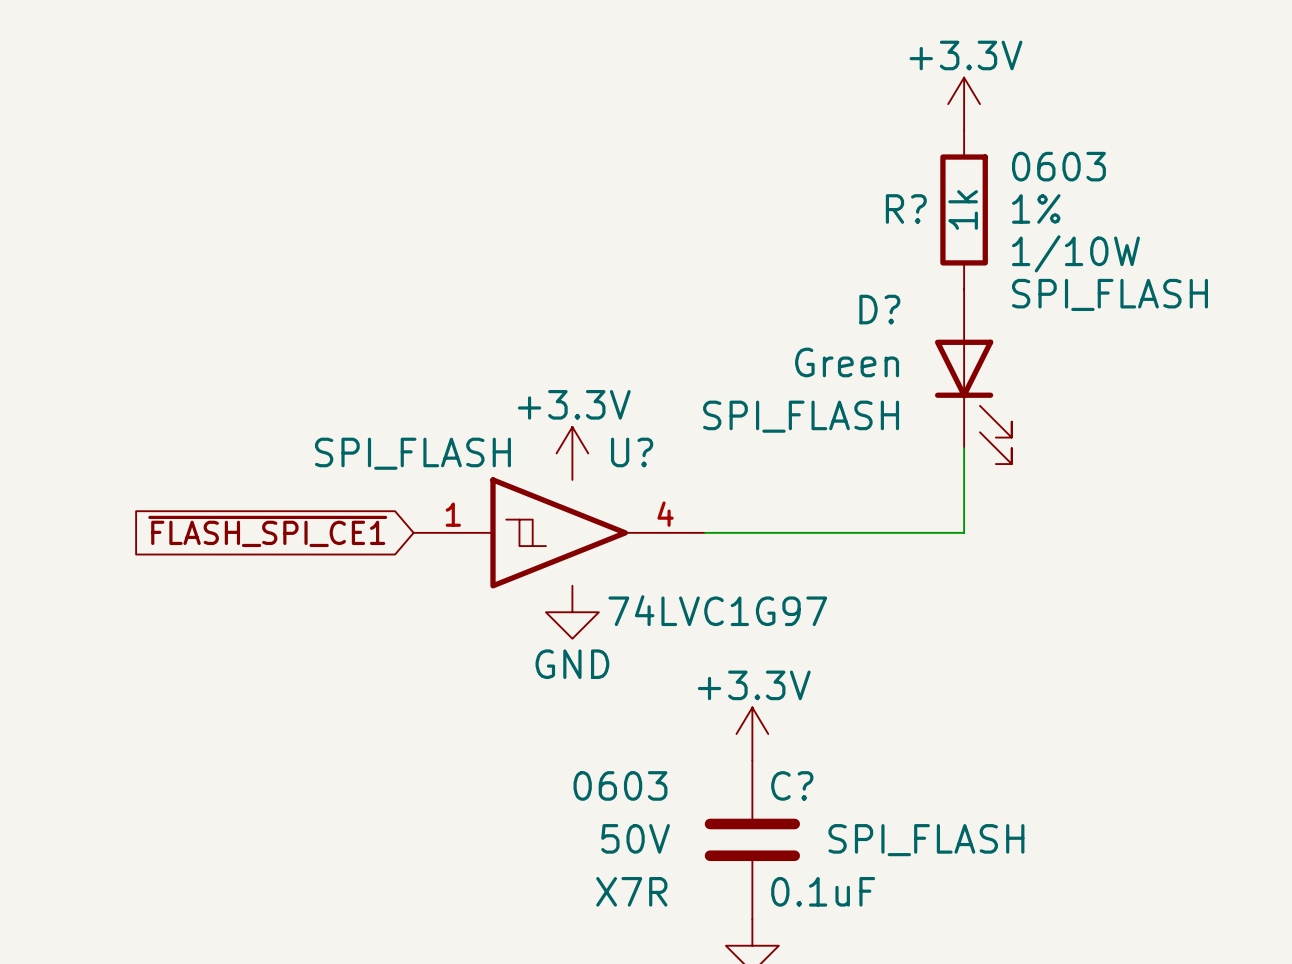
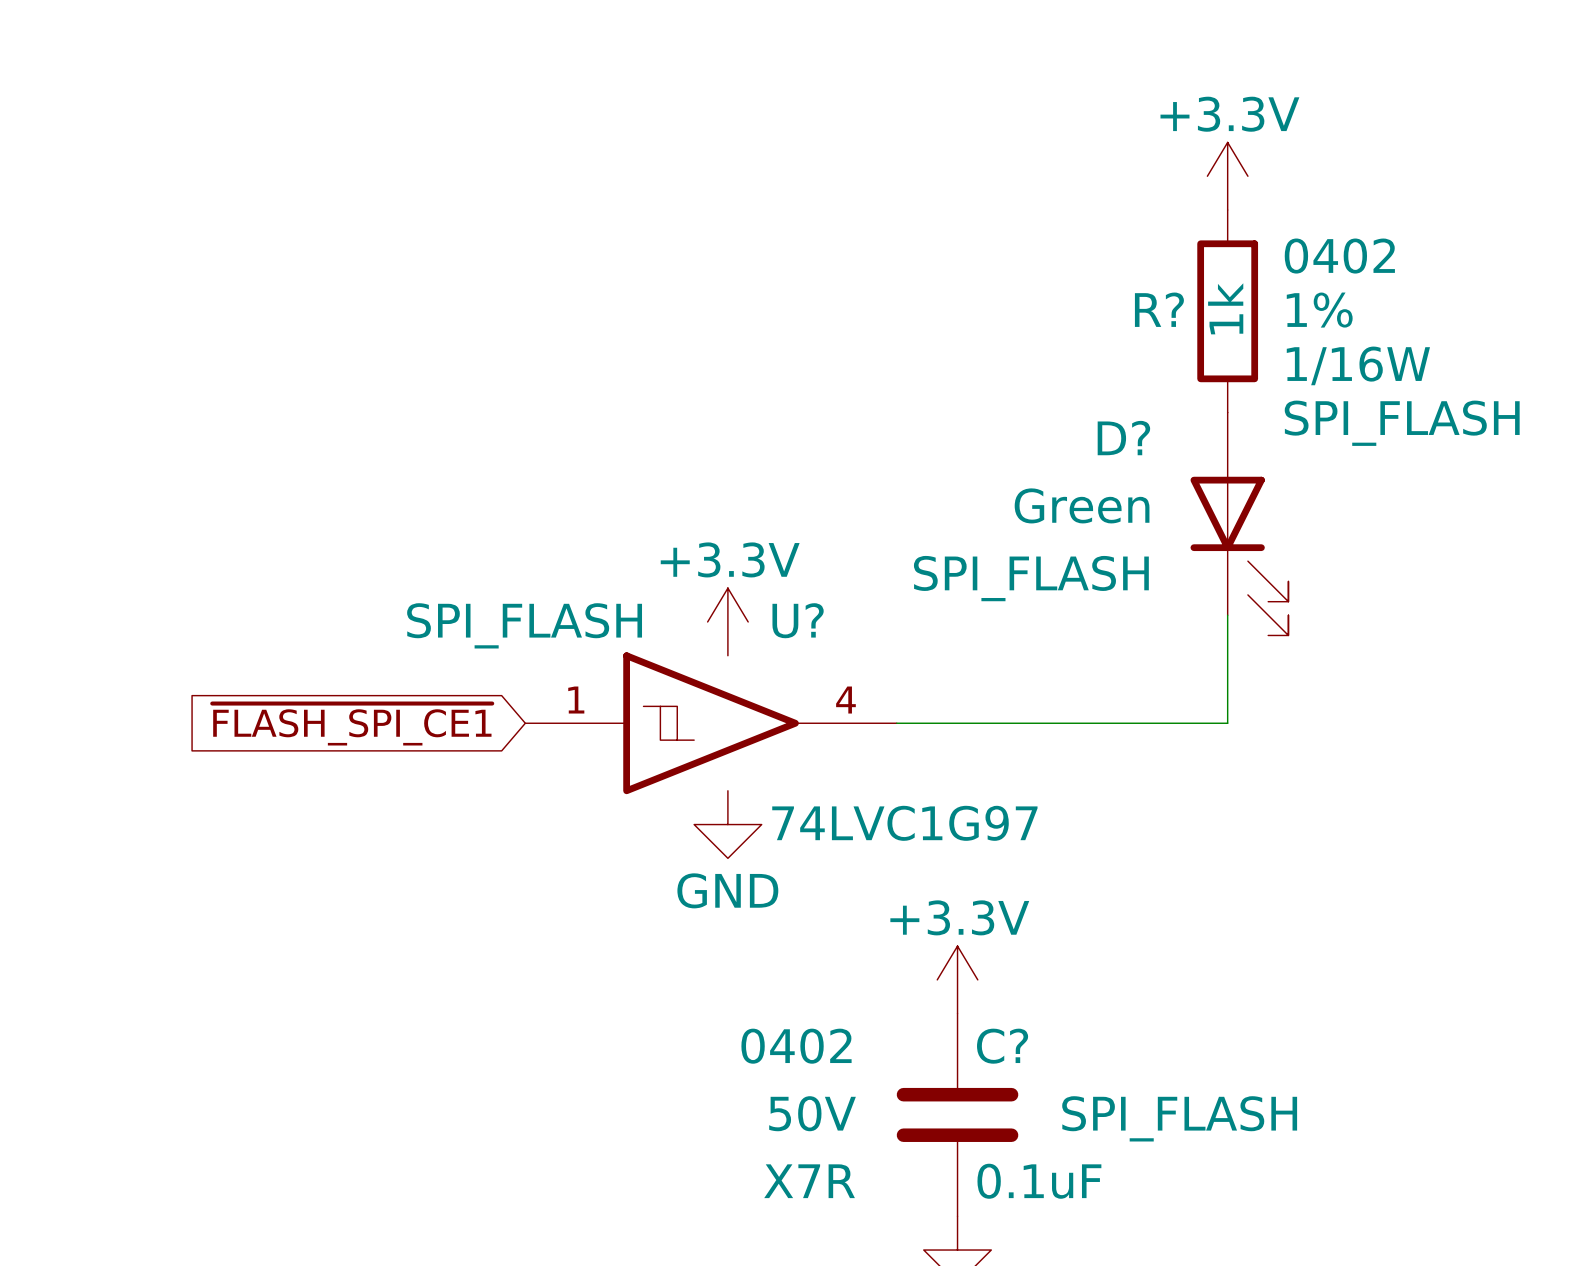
R? text: 0603 (1058, 166) -> 0402 (1339, 256)
R? text: 1/10W (1075, 253) -> 1/16W (1358, 365)
C? text: 0603 (620, 785) -> 0402 (796, 1046)

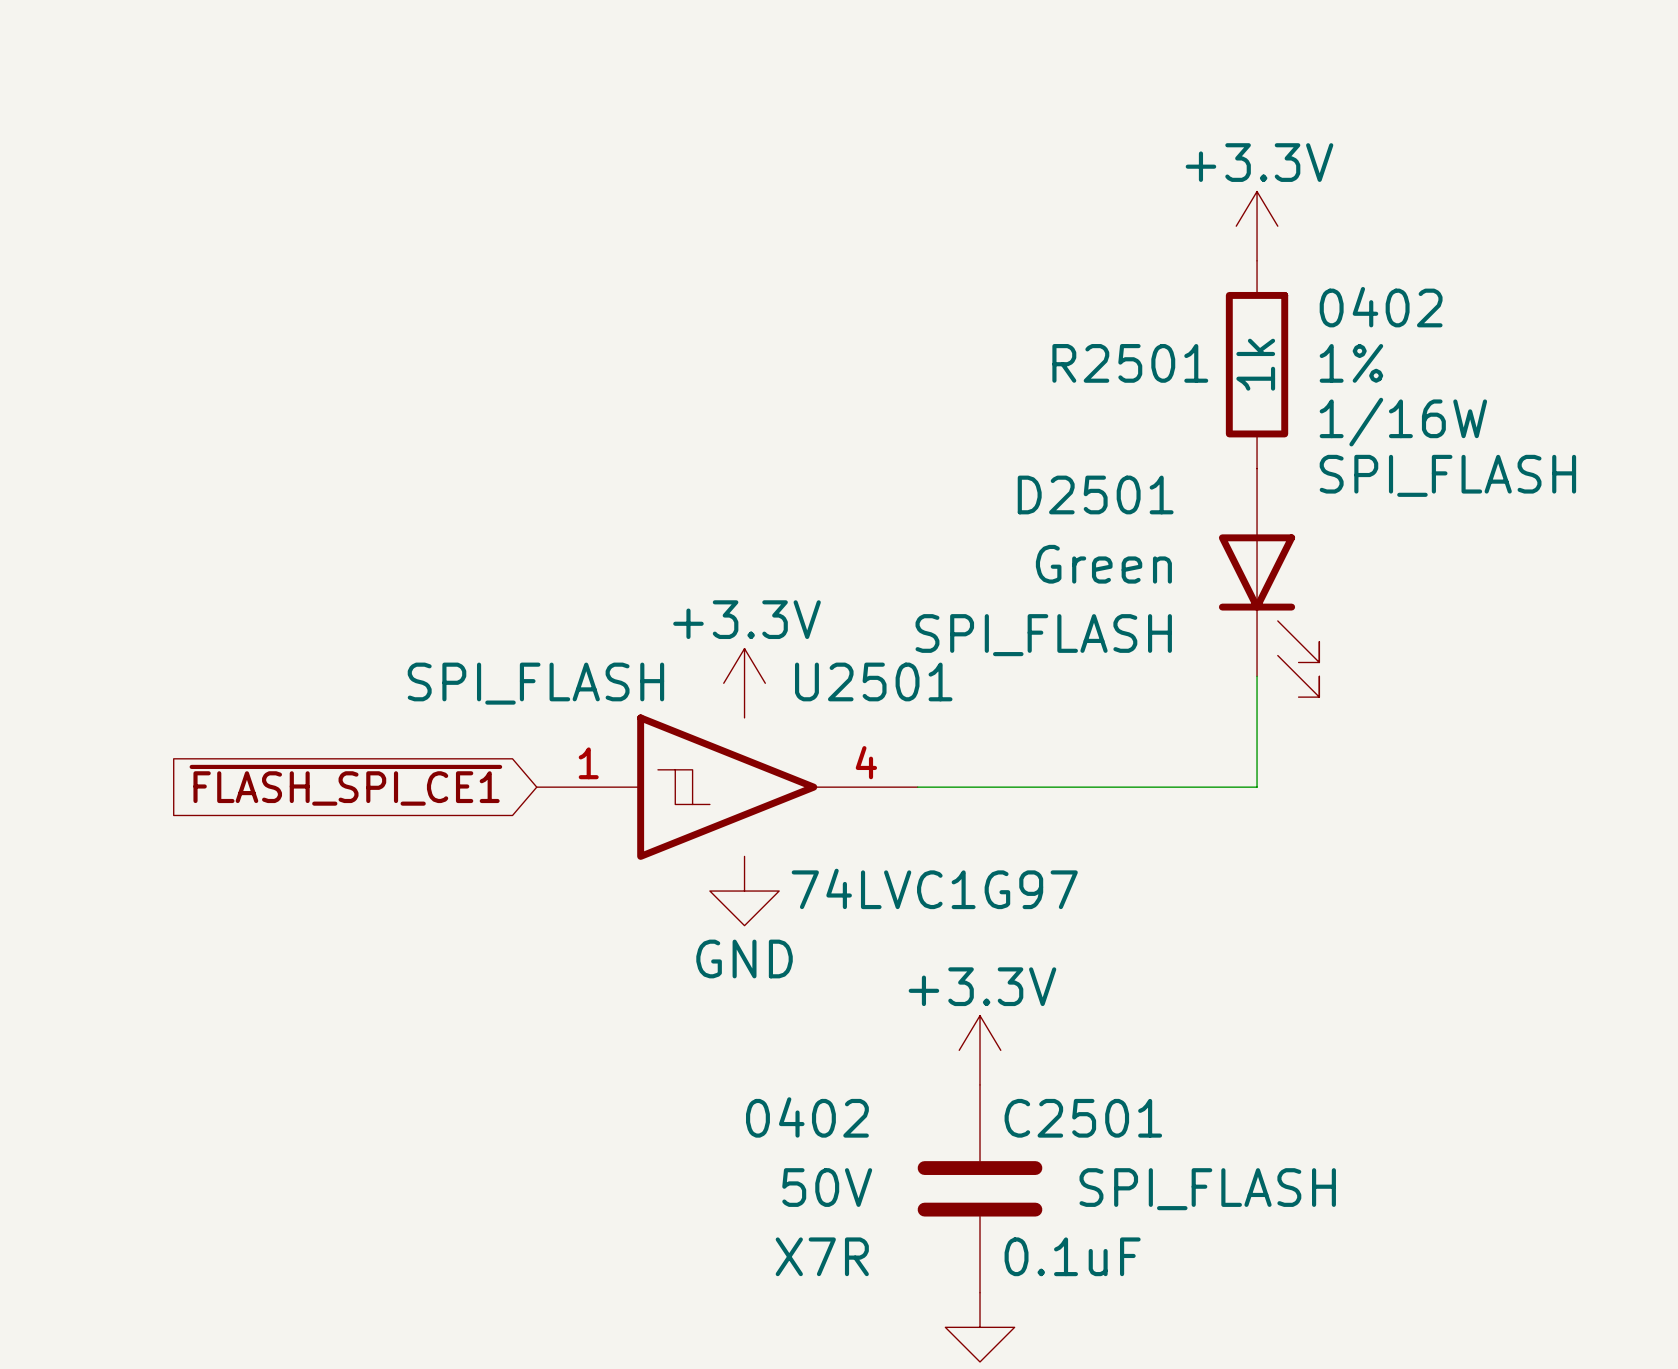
R? name: R? (1159, 309) -> R2501 (1130, 363)
D? name: D? (1123, 438) -> D2501 (1095, 494)
U? name: U? (798, 620) -> U2501 (873, 681)
C? name: C? (1002, 1046) -> C2501 (1083, 1118)

